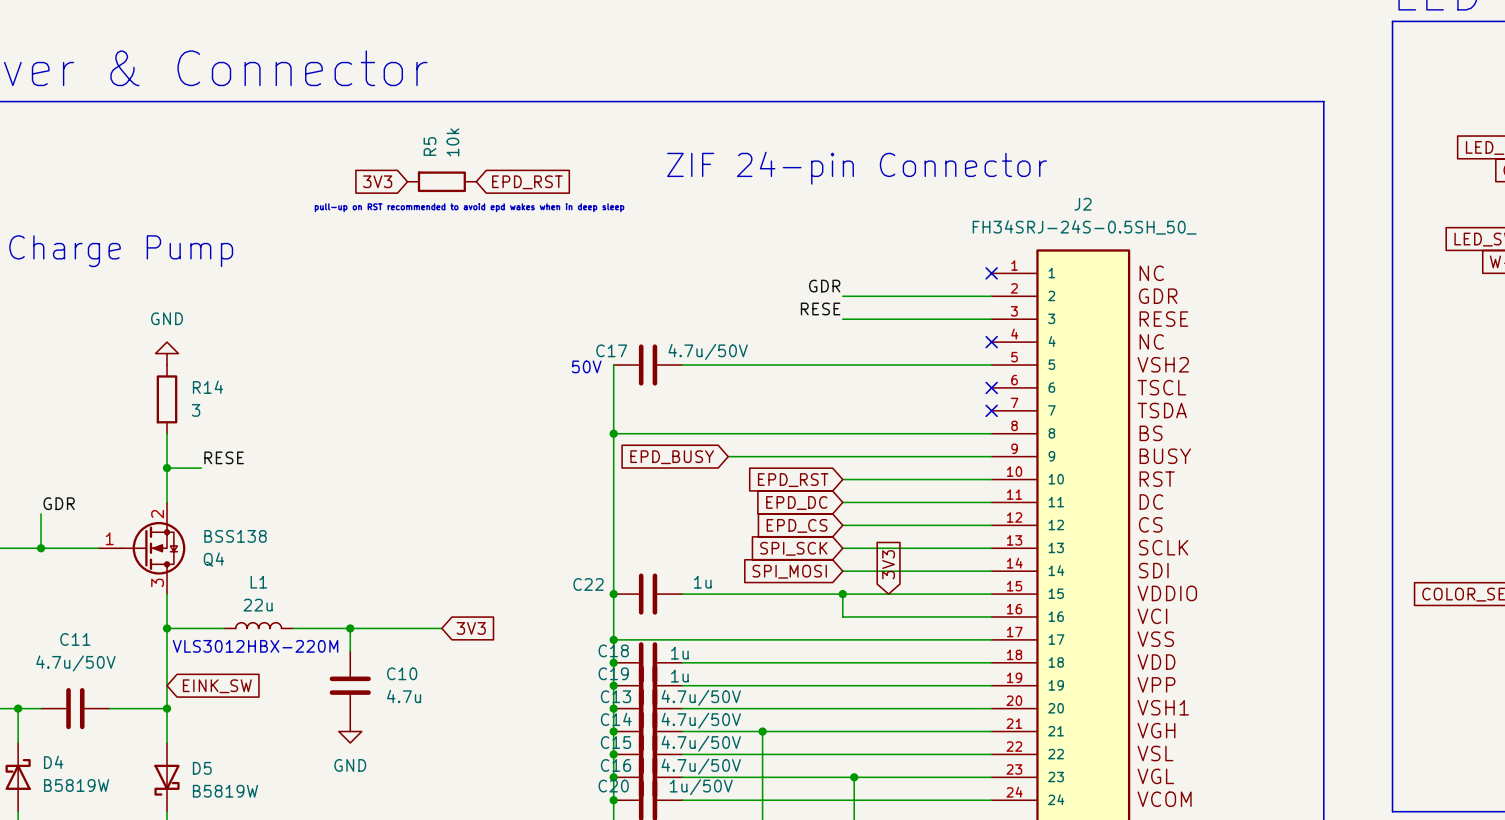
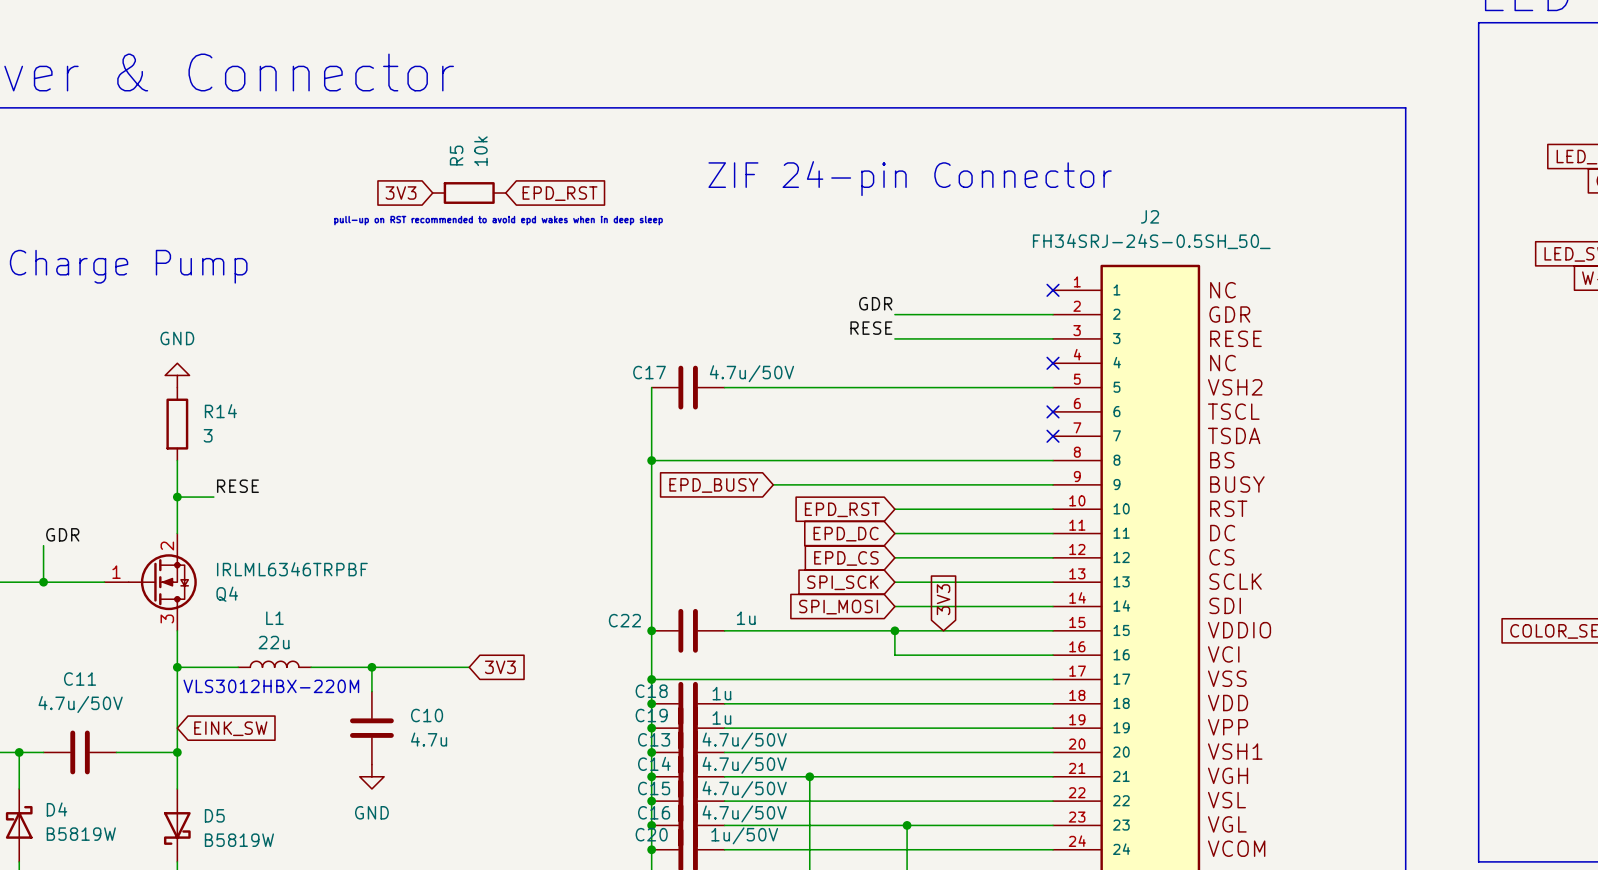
text: 50V (586, 366) -> none
Q4 value: BSS138 (235, 536) -> IRLML6346TRPBF (292, 569)

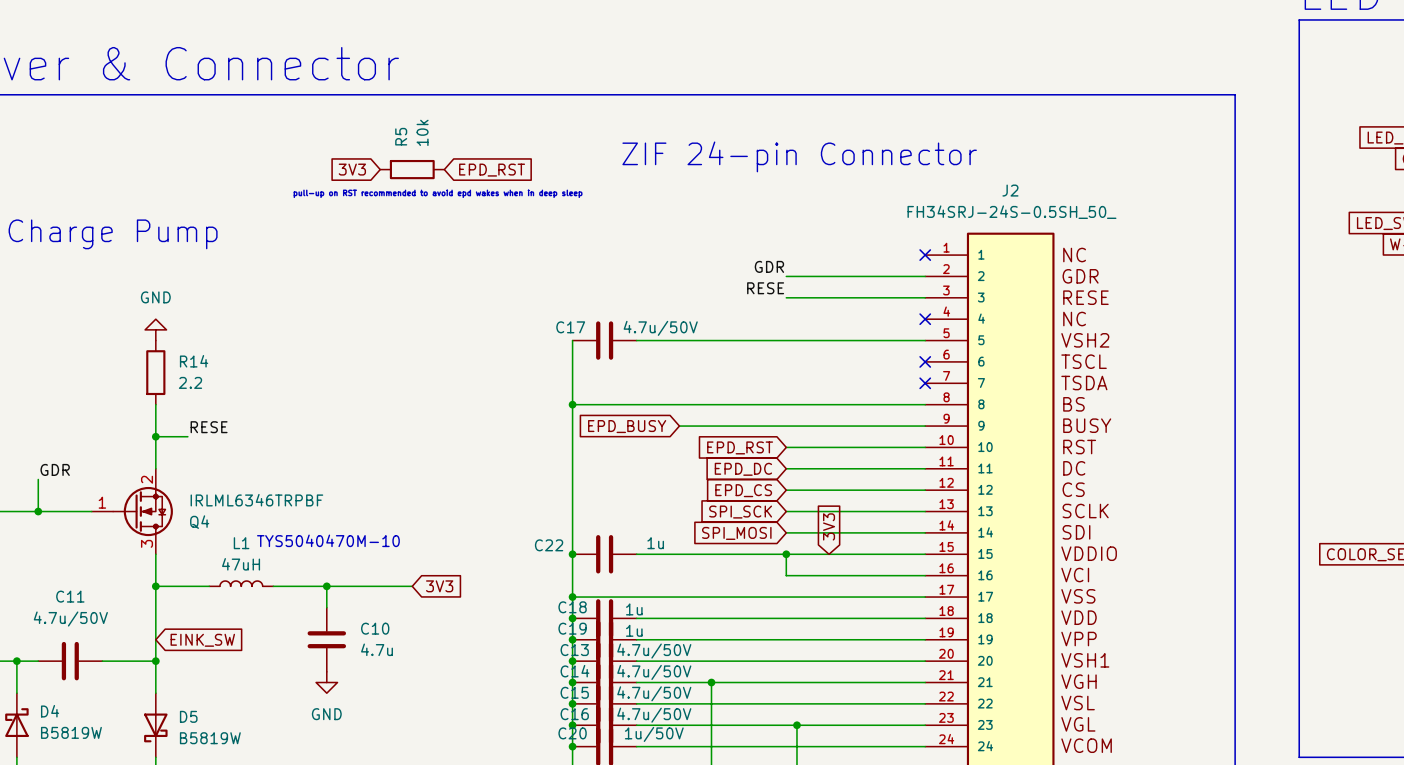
R14 value: 3 (208, 435) -> 2.2 (190, 382)
text: none -> TYS5040470M-10 (328, 540)
L1 value: 22u (274, 642) -> 47uH (241, 564)
text: VLS3012HBX-220M (271, 686) -> none

